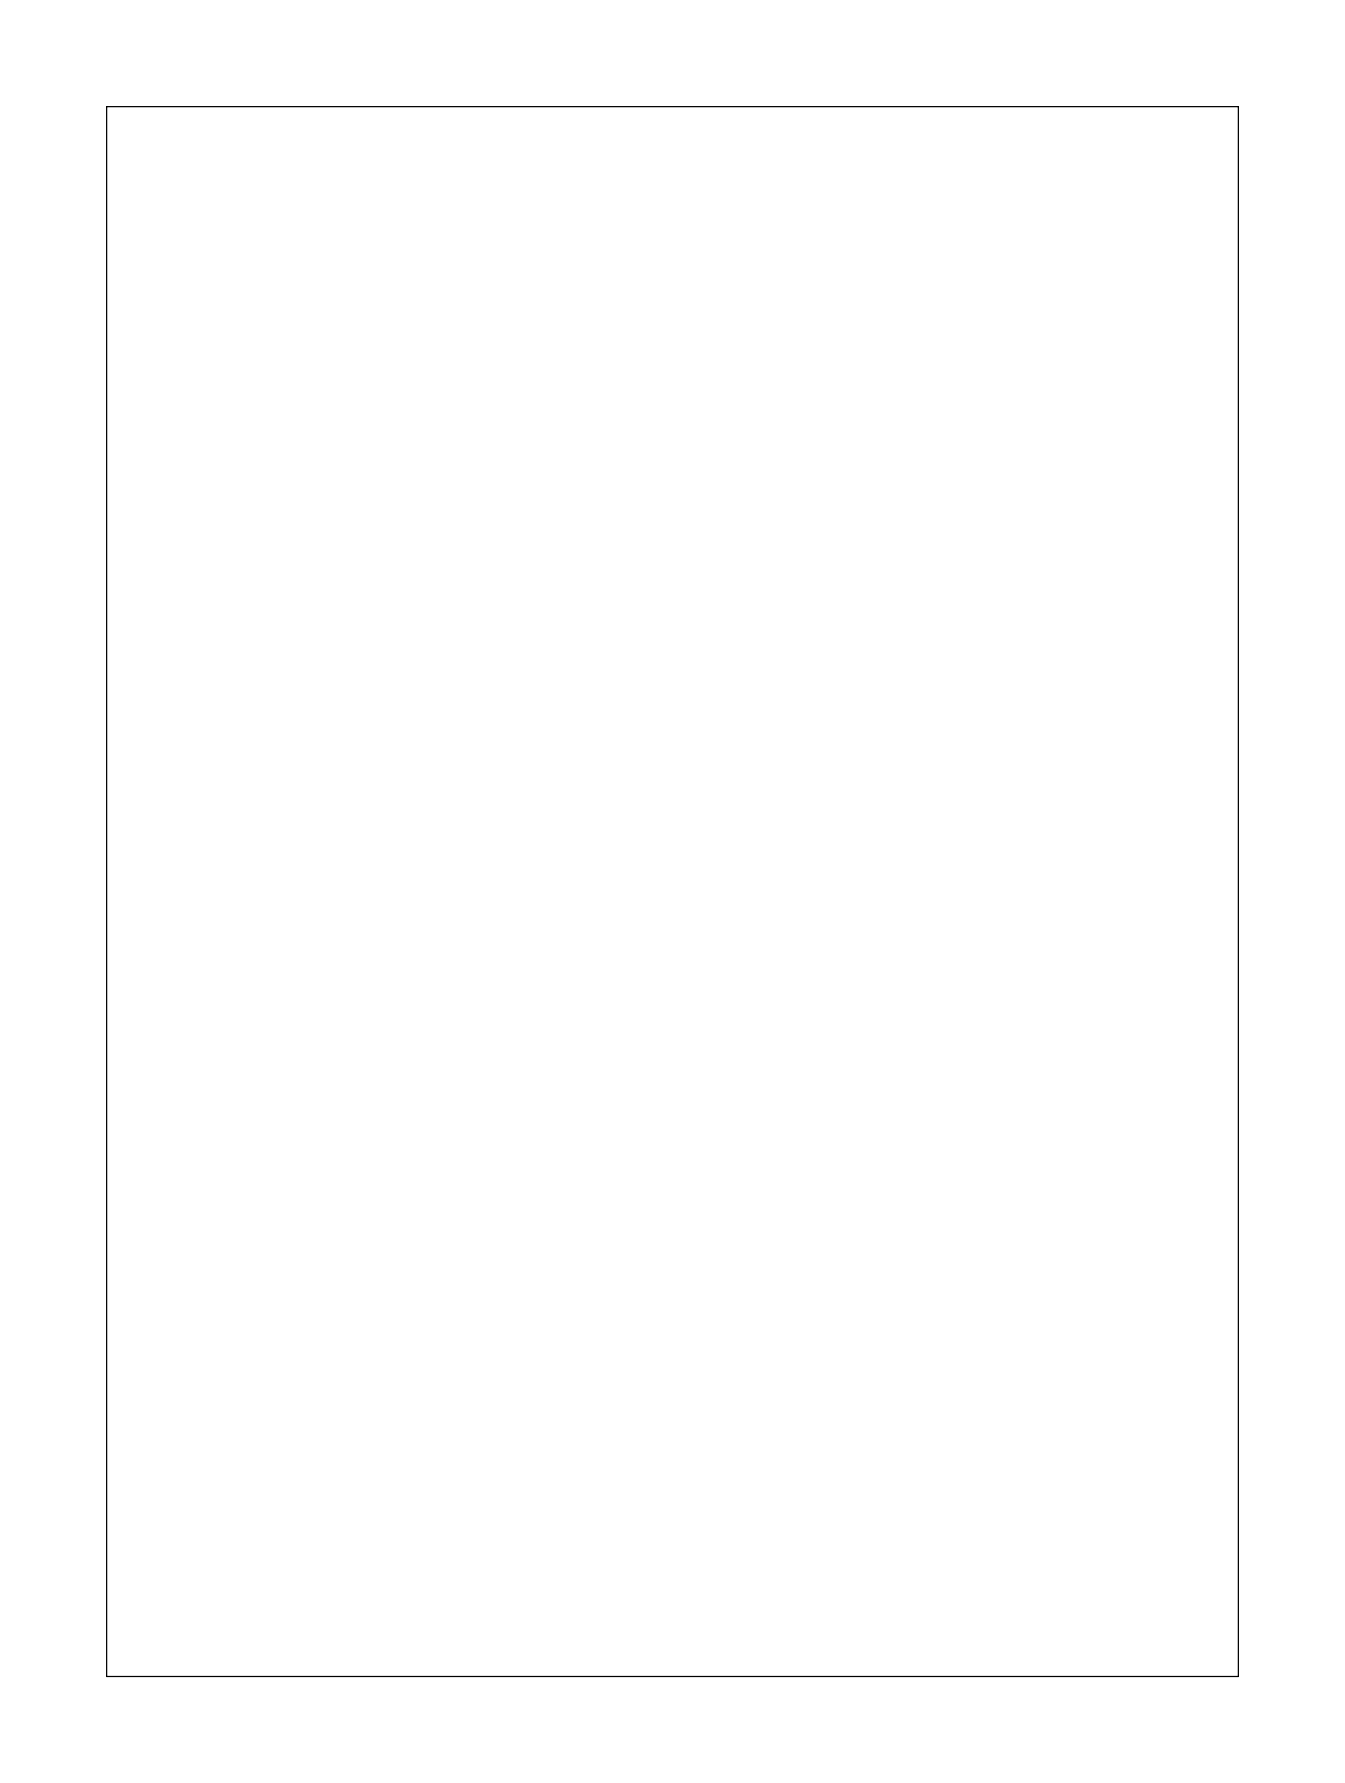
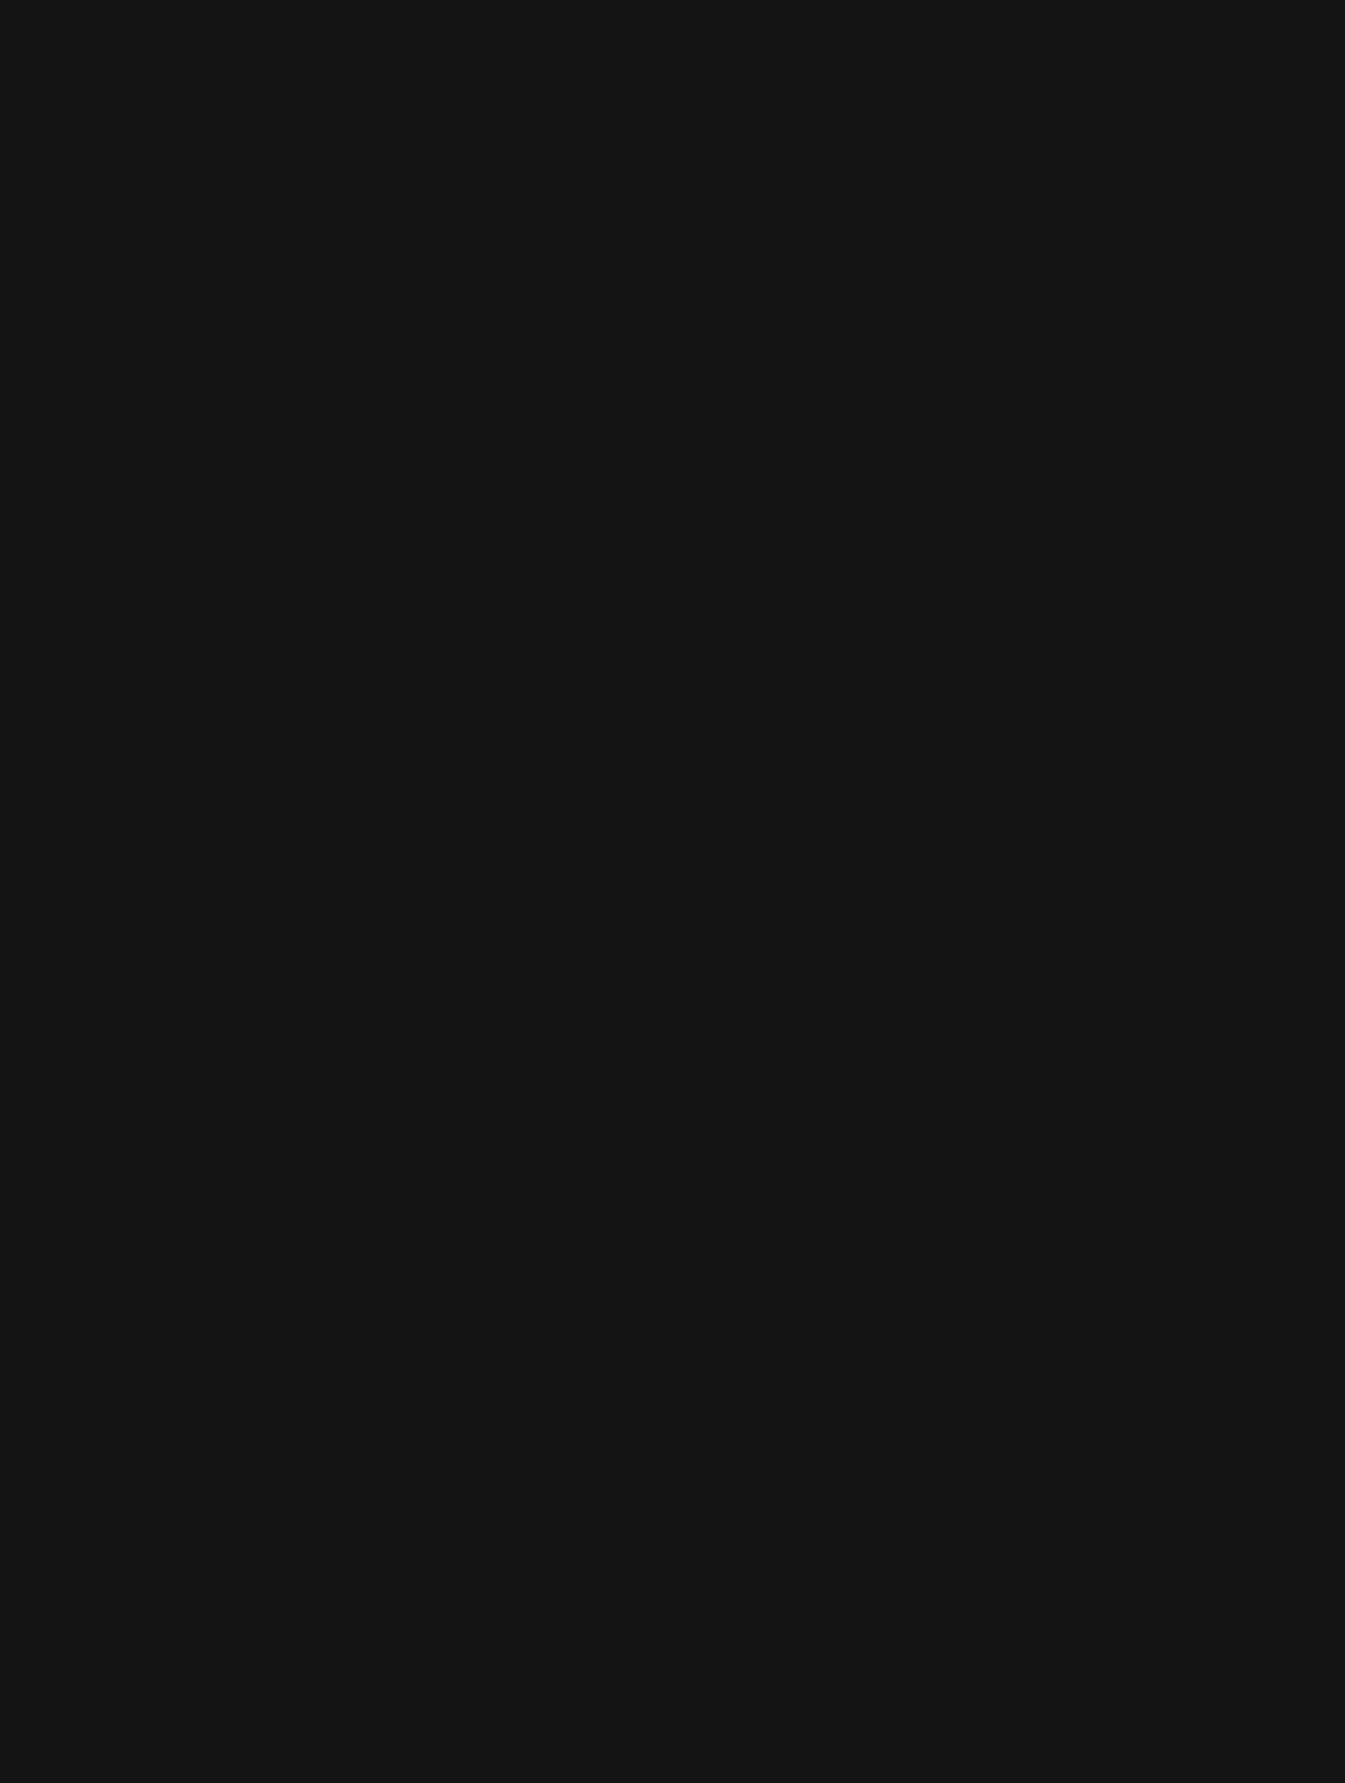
board edge: (1238, 106) (106, 106) (106, 1676) (1238, 1676) (1238, 106) -> none

